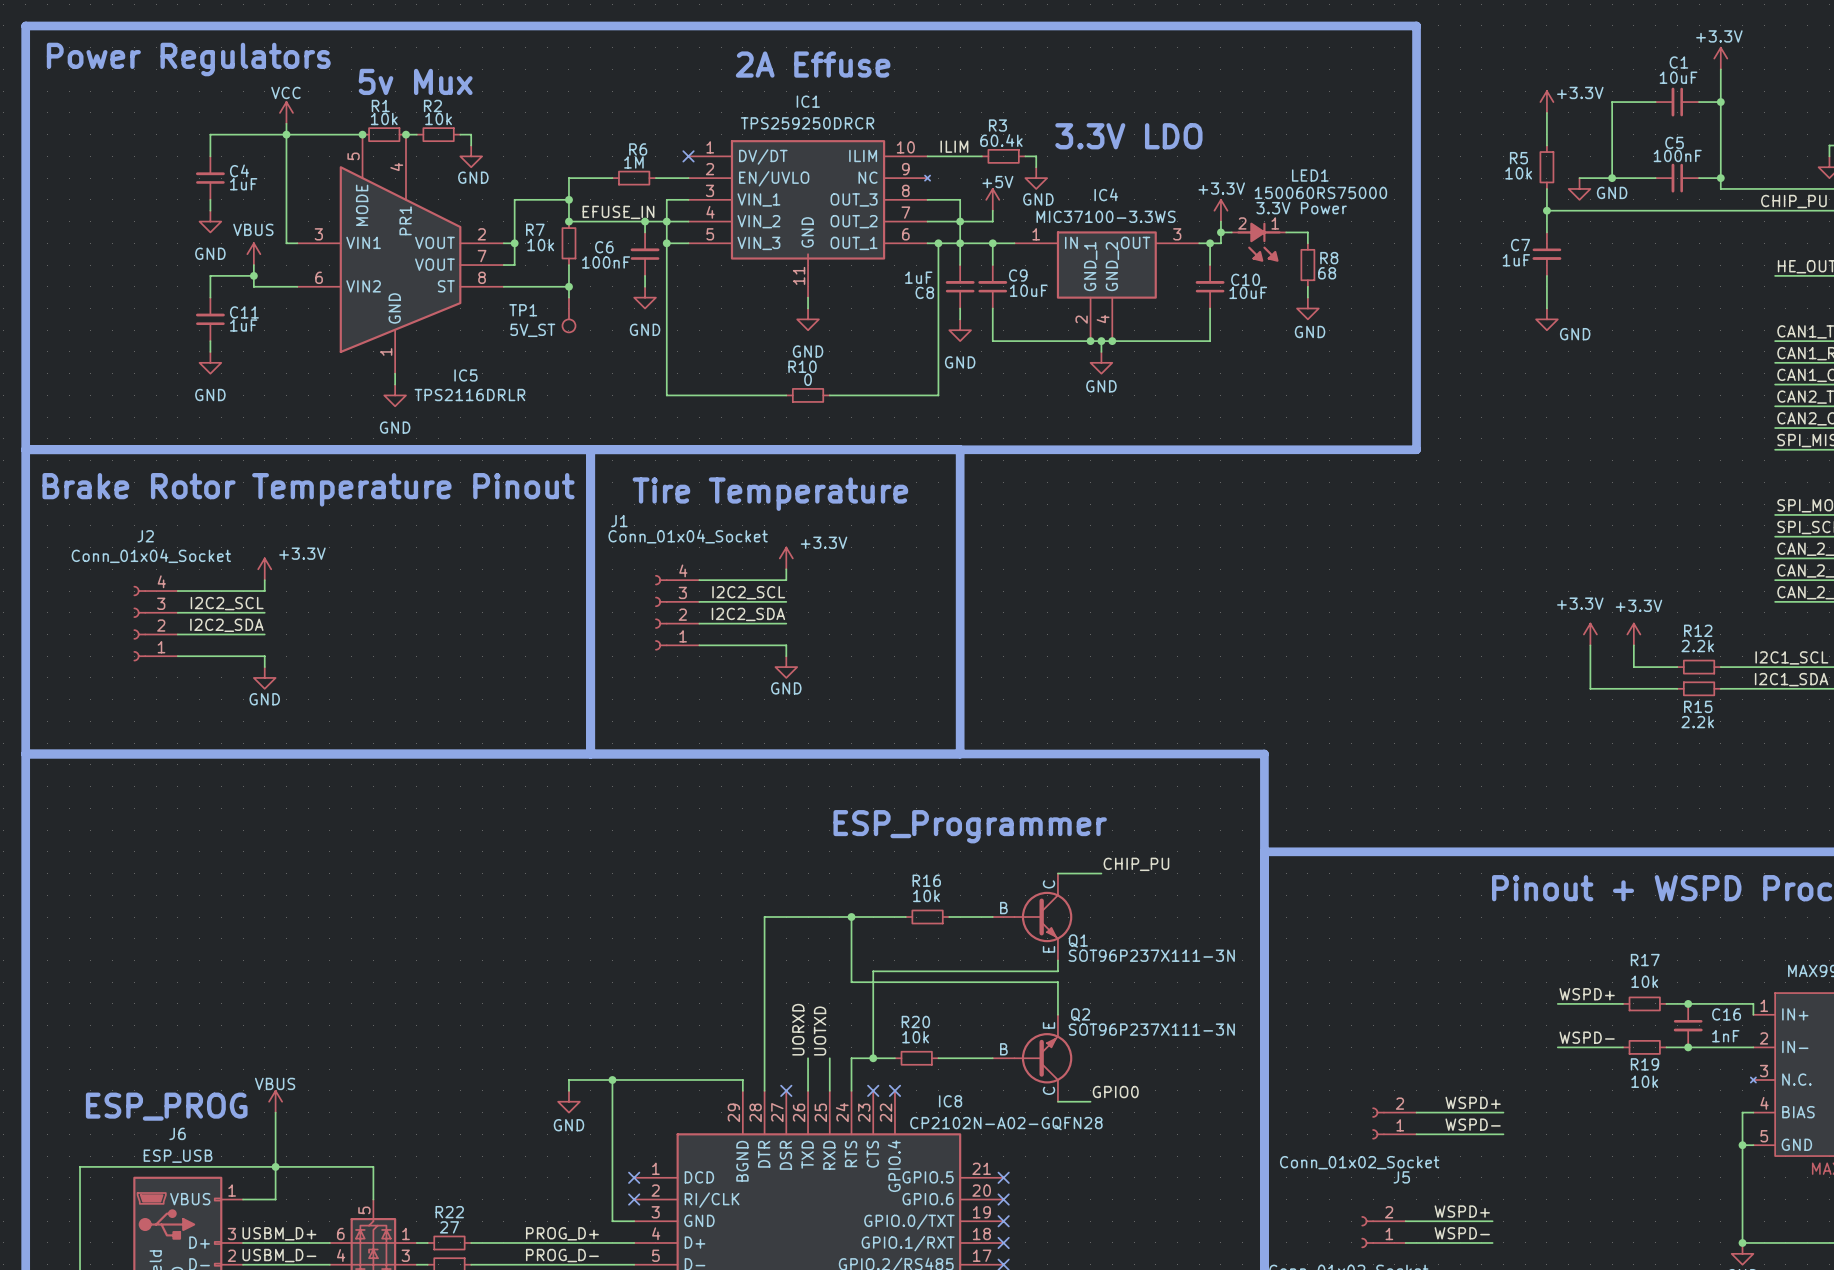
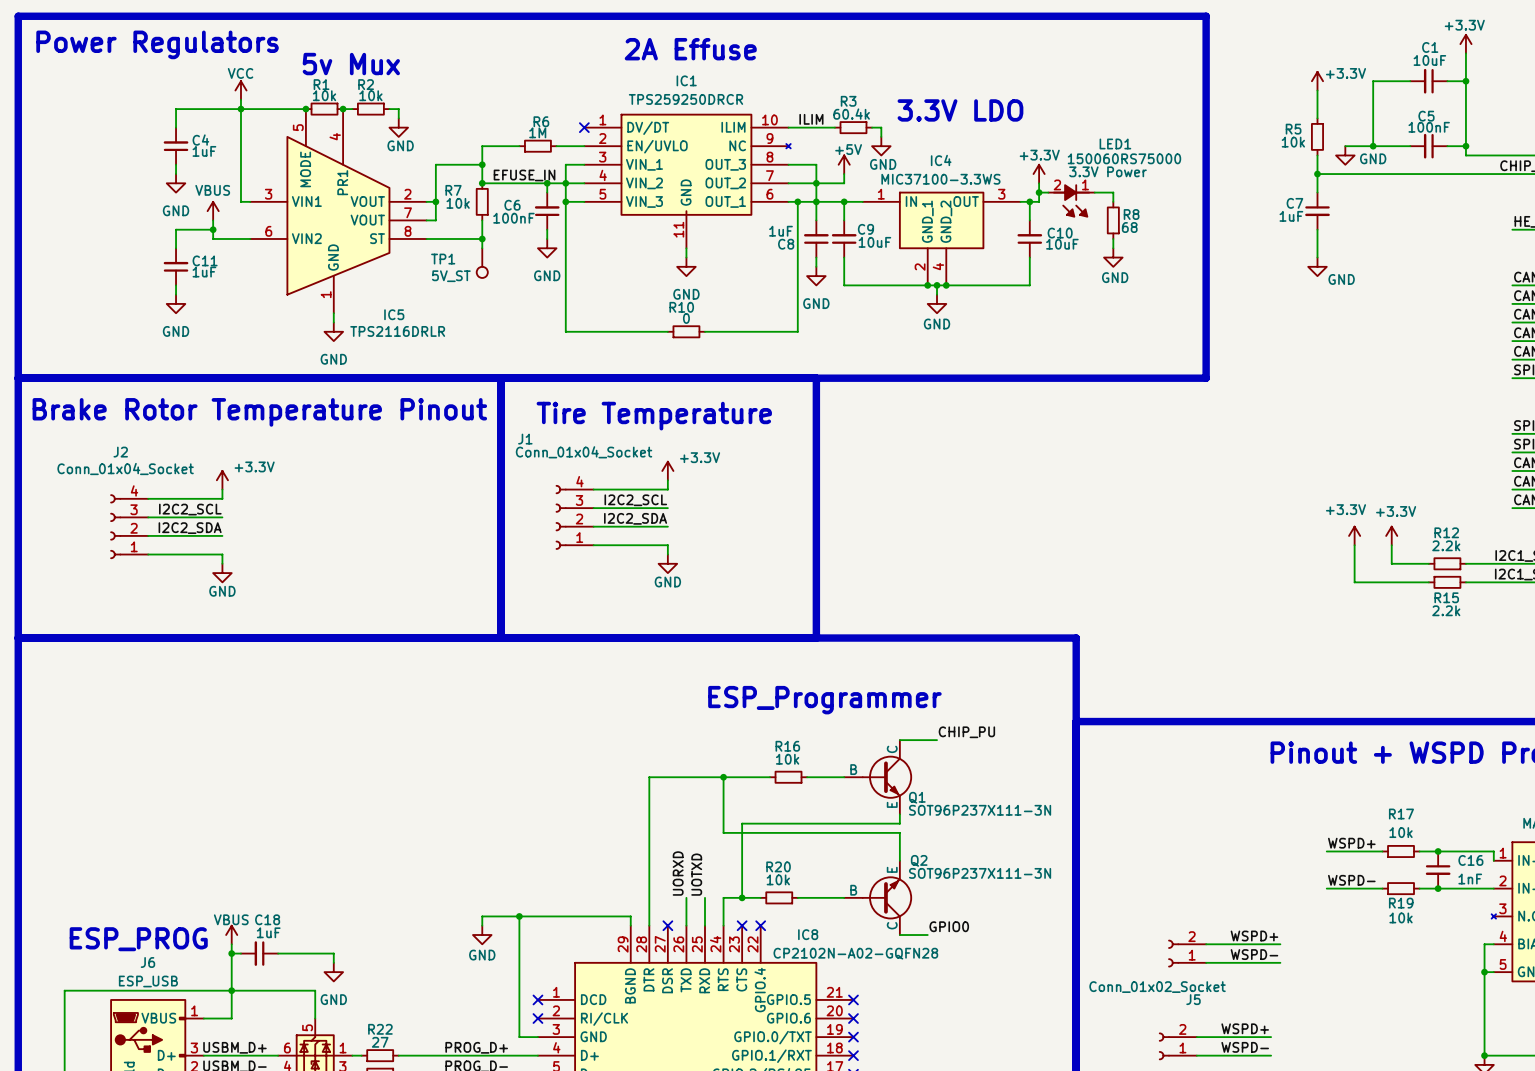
wire: none -> (231, 953) (240, 953)
junction: none -> (231, 953)
C18: none -> 1uF (259, 953)
wire: none -> (278, 953) (333, 953) (333, 962)
power symbol: none -> GND (333, 972)

